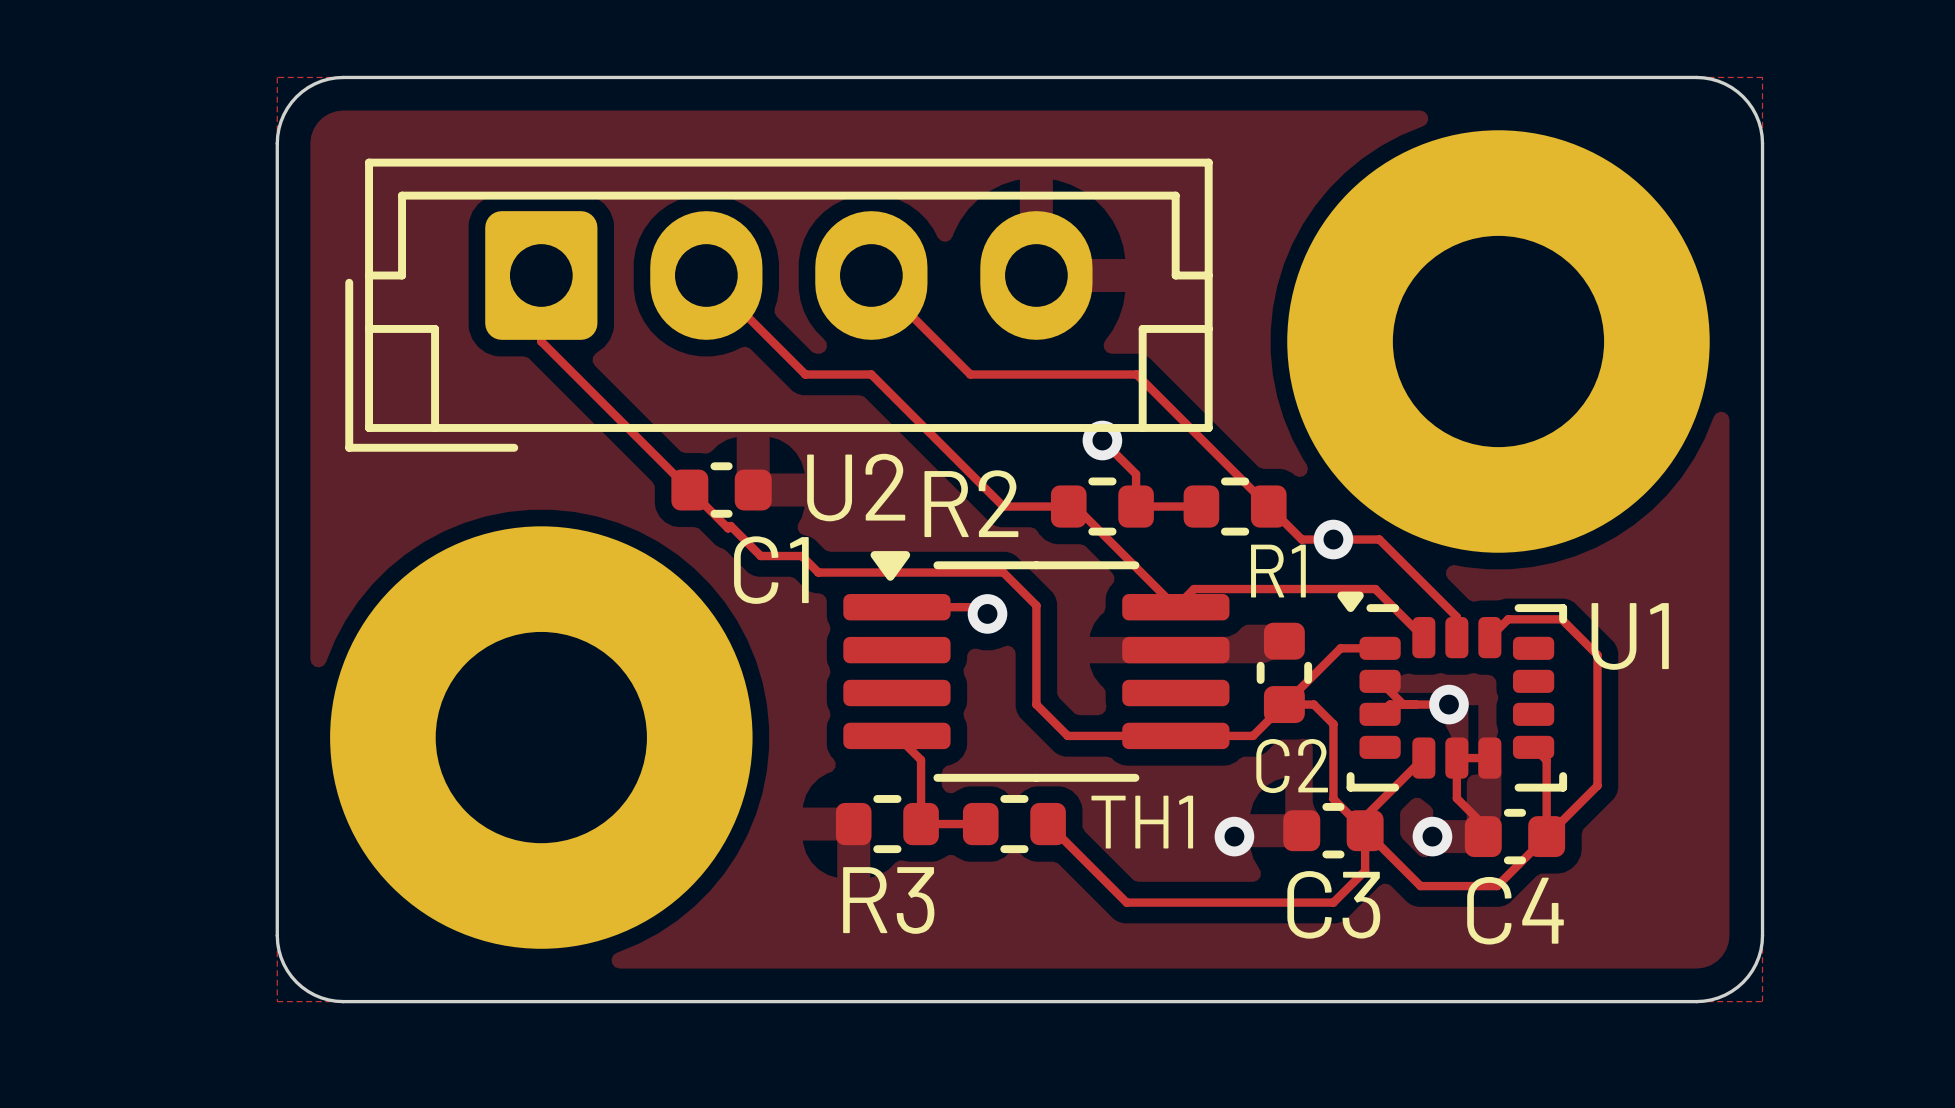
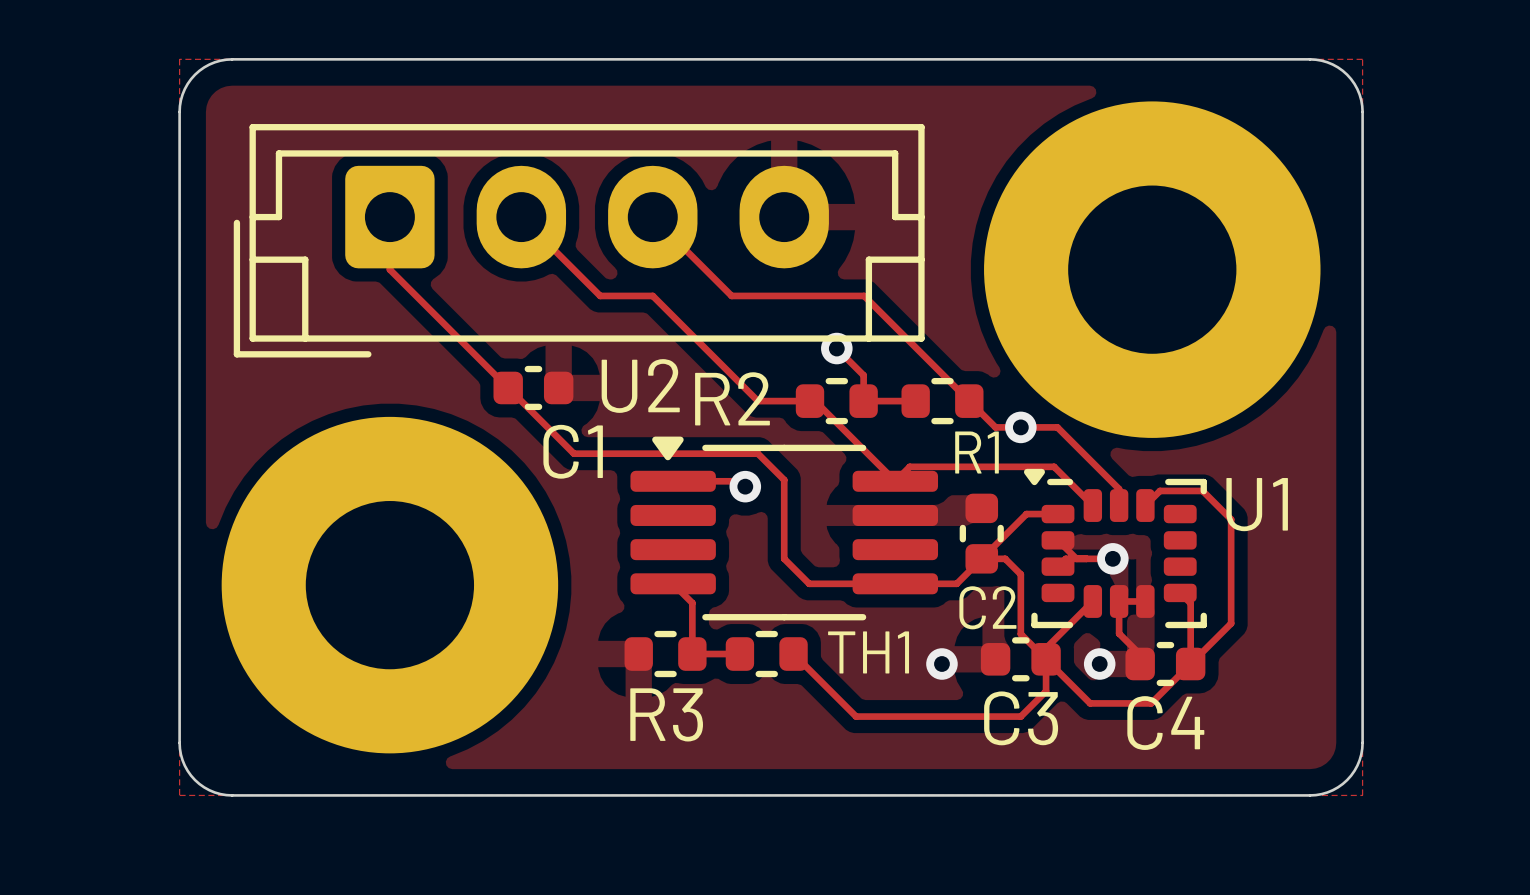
track: (728, 528) (730, 525) (760, 556) (801, 556) (818, 572) -> (538, 418) (573, 453) (610, 453)

